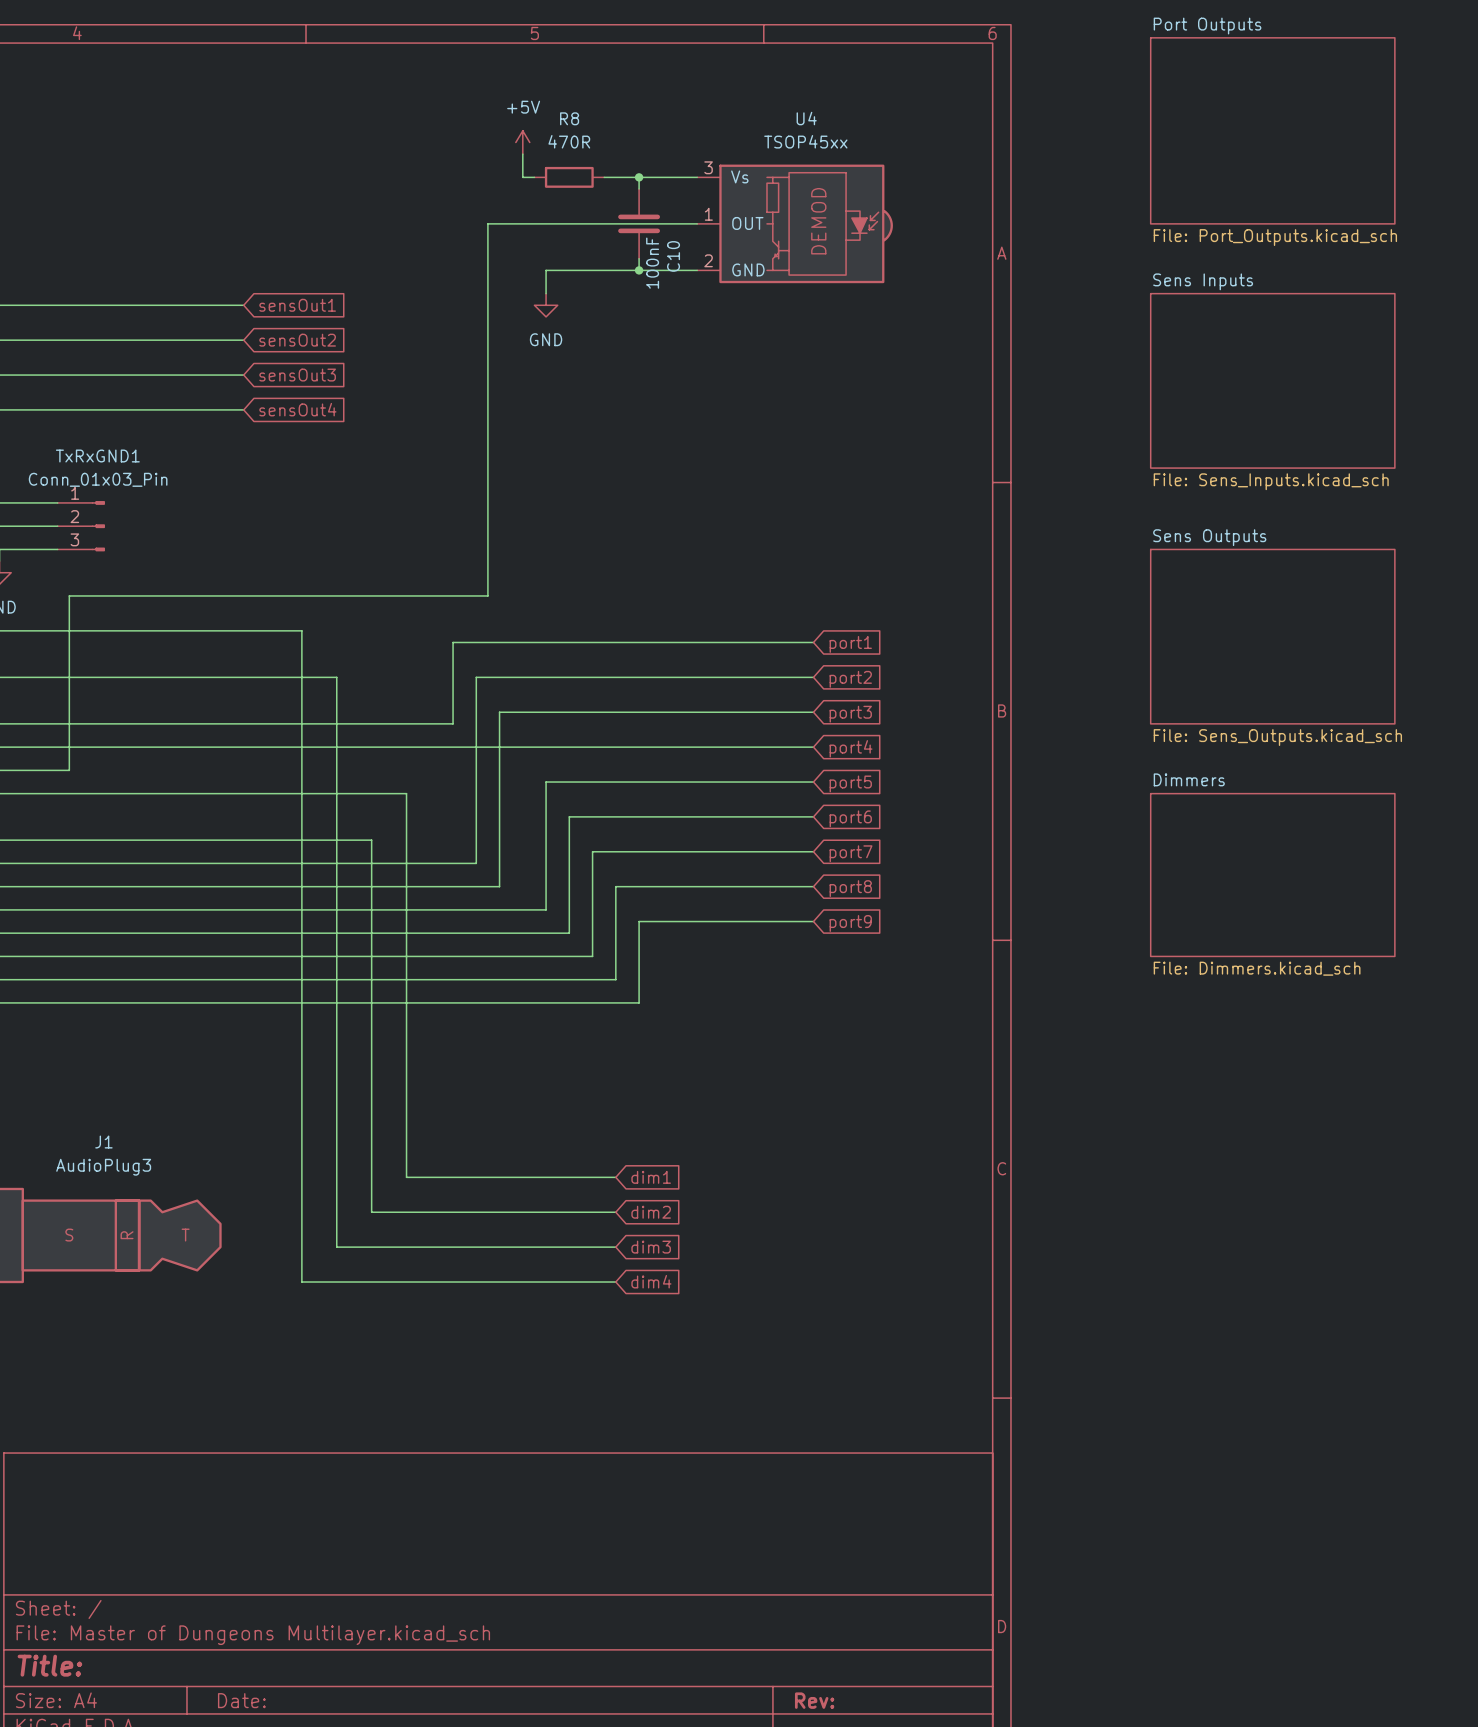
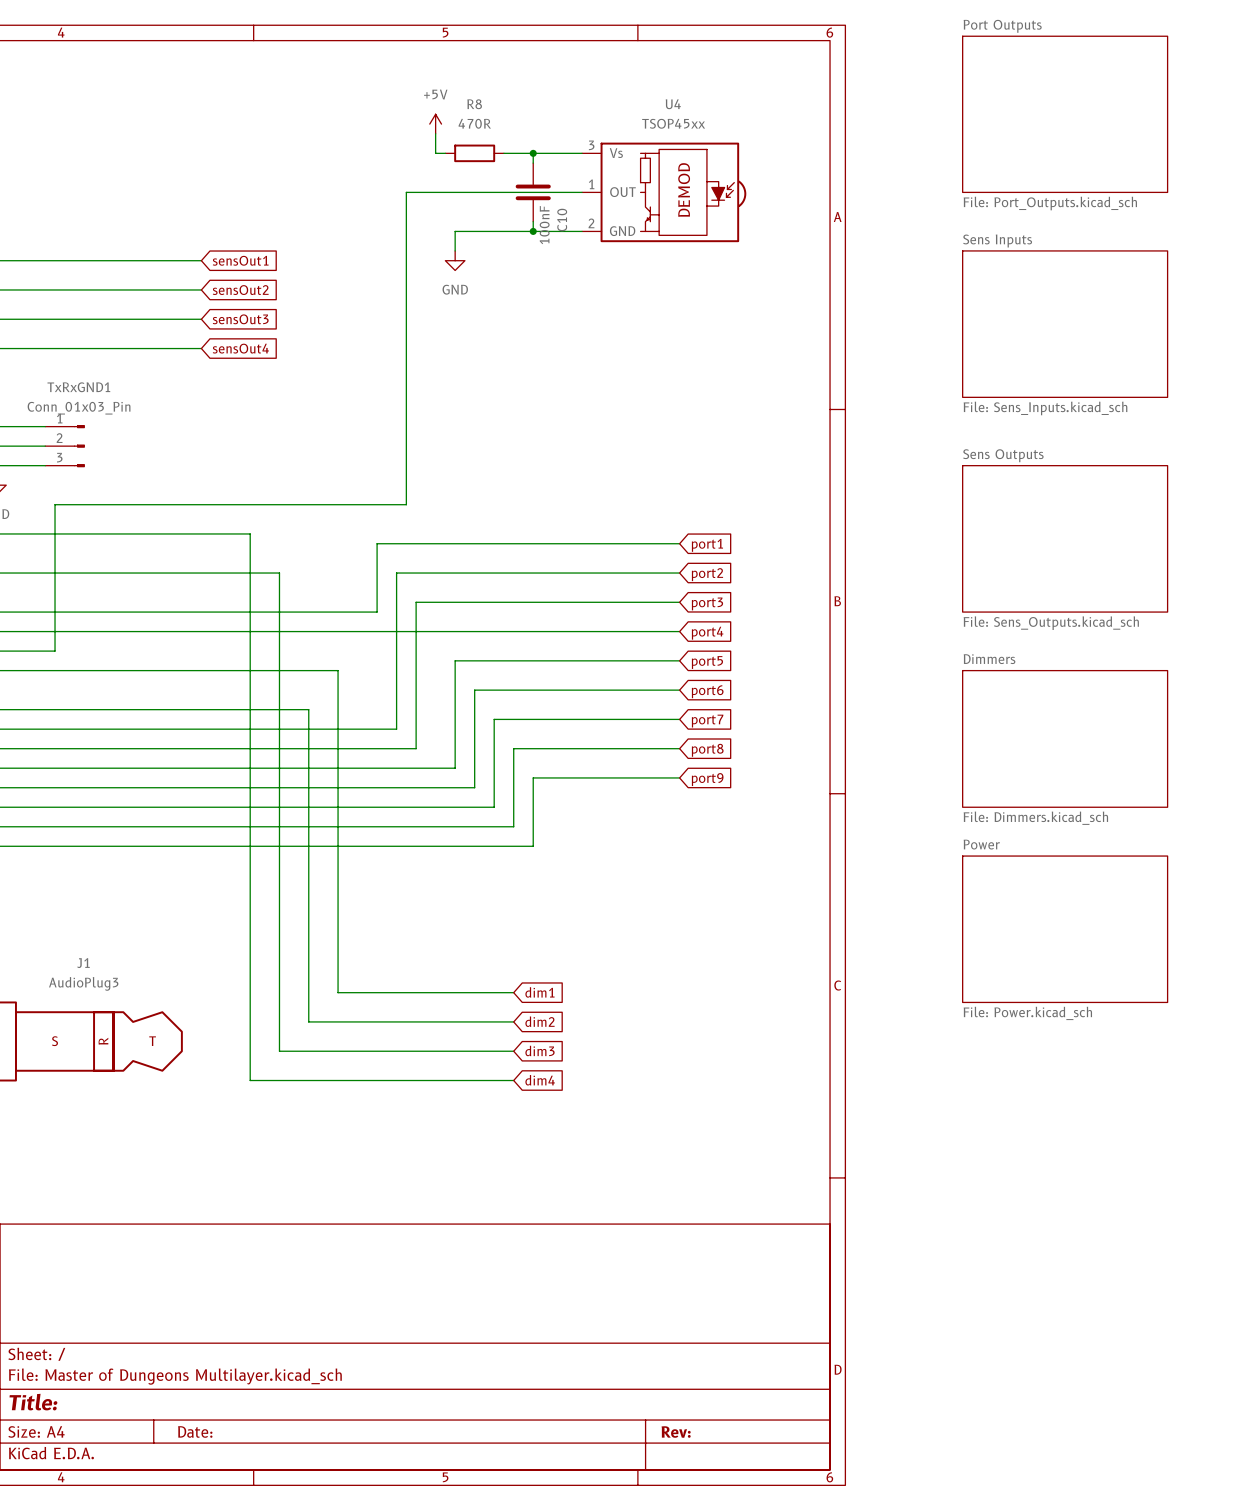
sheet Power: none -> File: Power.kicad_sch (1065, 929)

